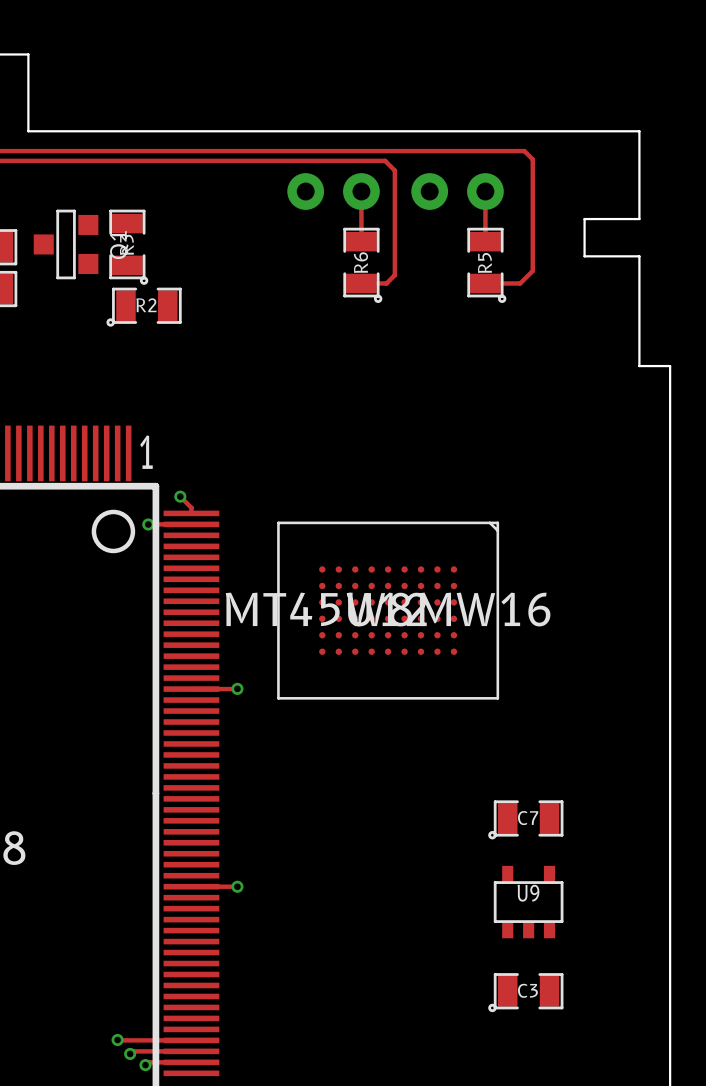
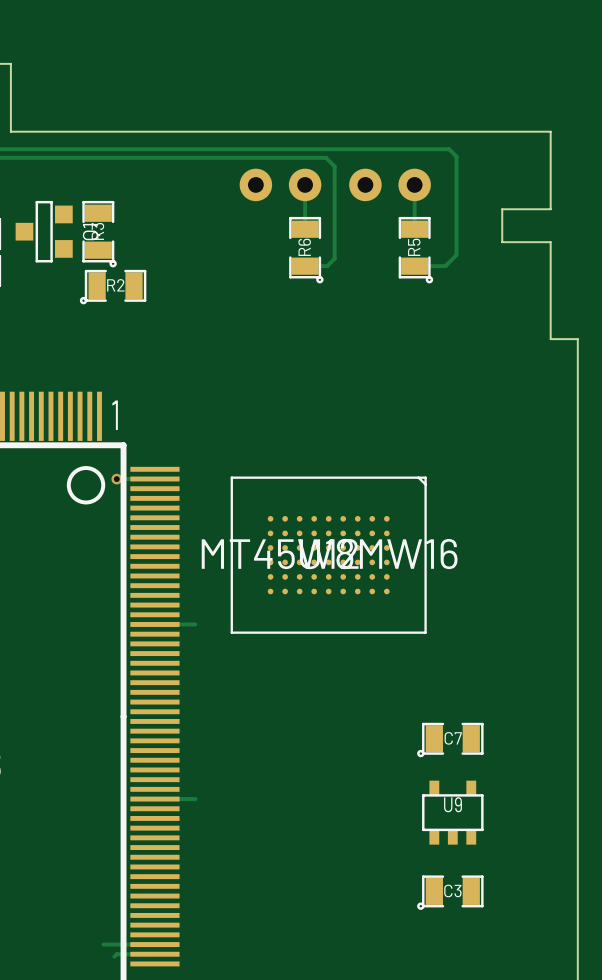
track: (180, 496) (191, 507) (191, 513) -> none
via: (180, 496) -> none
via: (237, 688) -> none
via: (237, 886) -> none
track: (117, 1040) (191, 1040) -> none
via: (117, 1040) -> none
via: (130, 1053) -> none
via: (145, 1065) -> none

